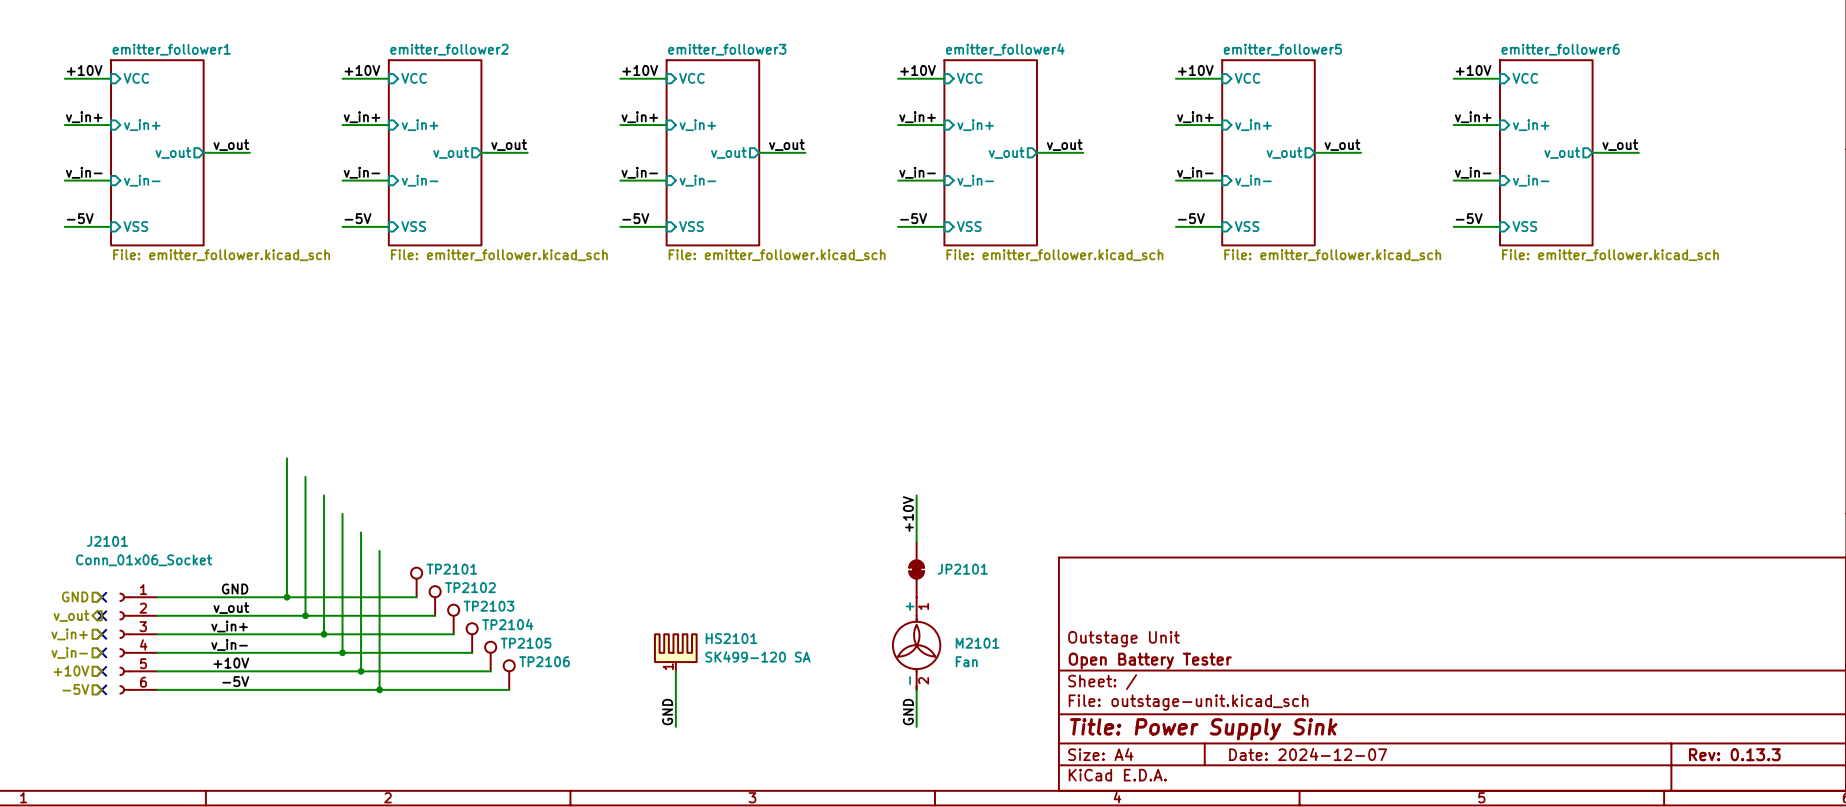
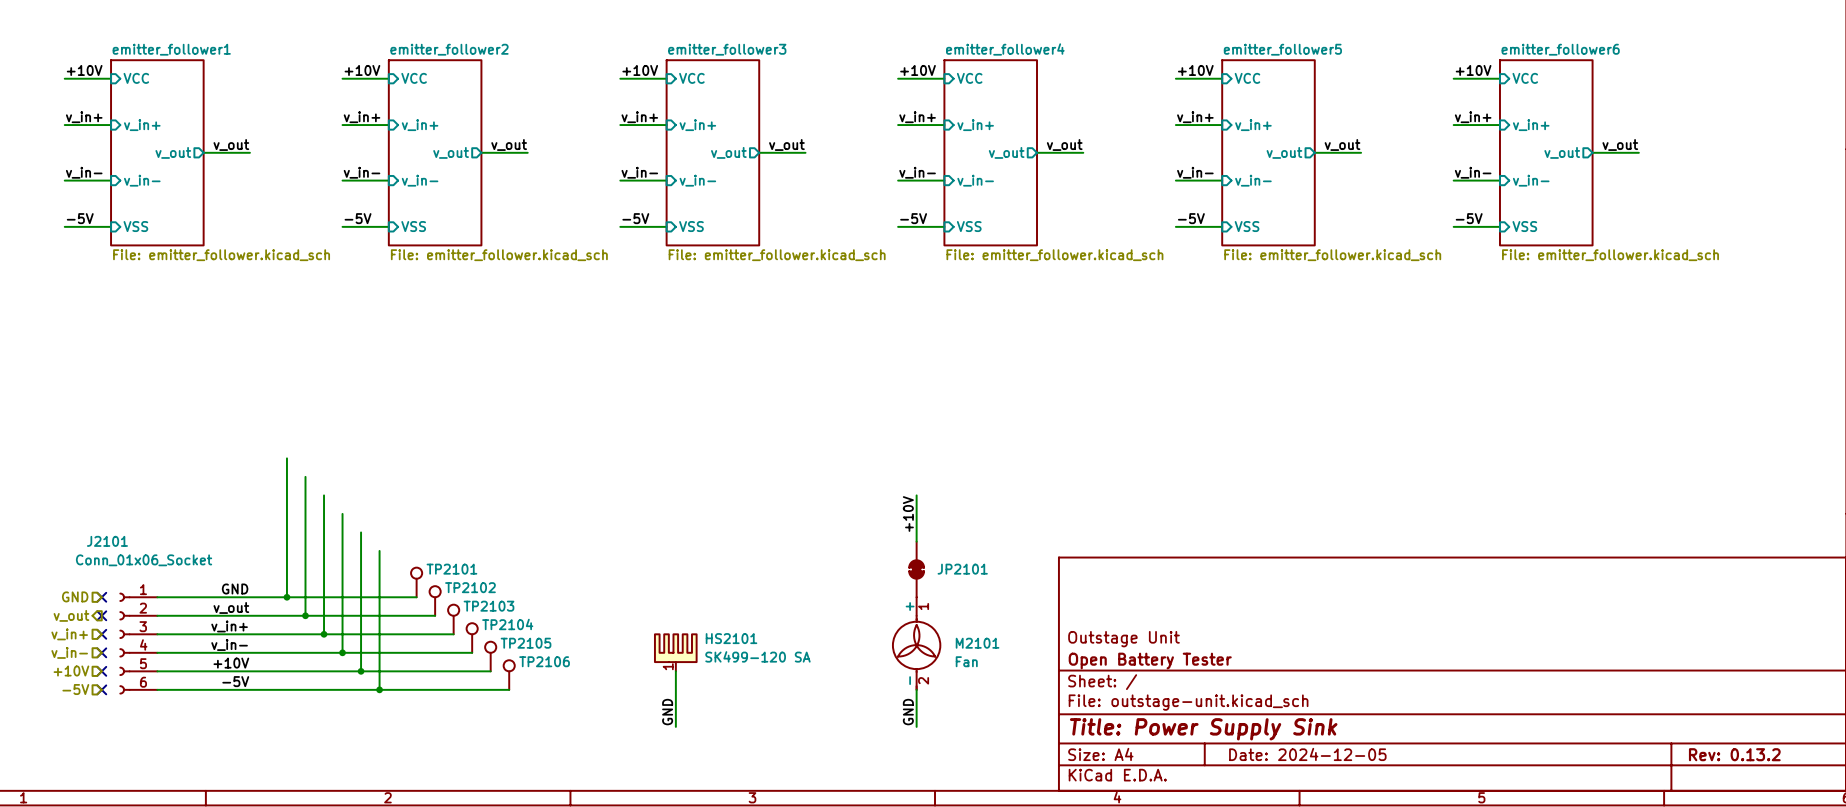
title block: Date: 2024-12-07 (1308, 754) -> Date: 2024-12-05 (1307, 754)
title block: Rev: 0.13.3 (1734, 754) -> Rev: 0.13.2 (1734, 754)

